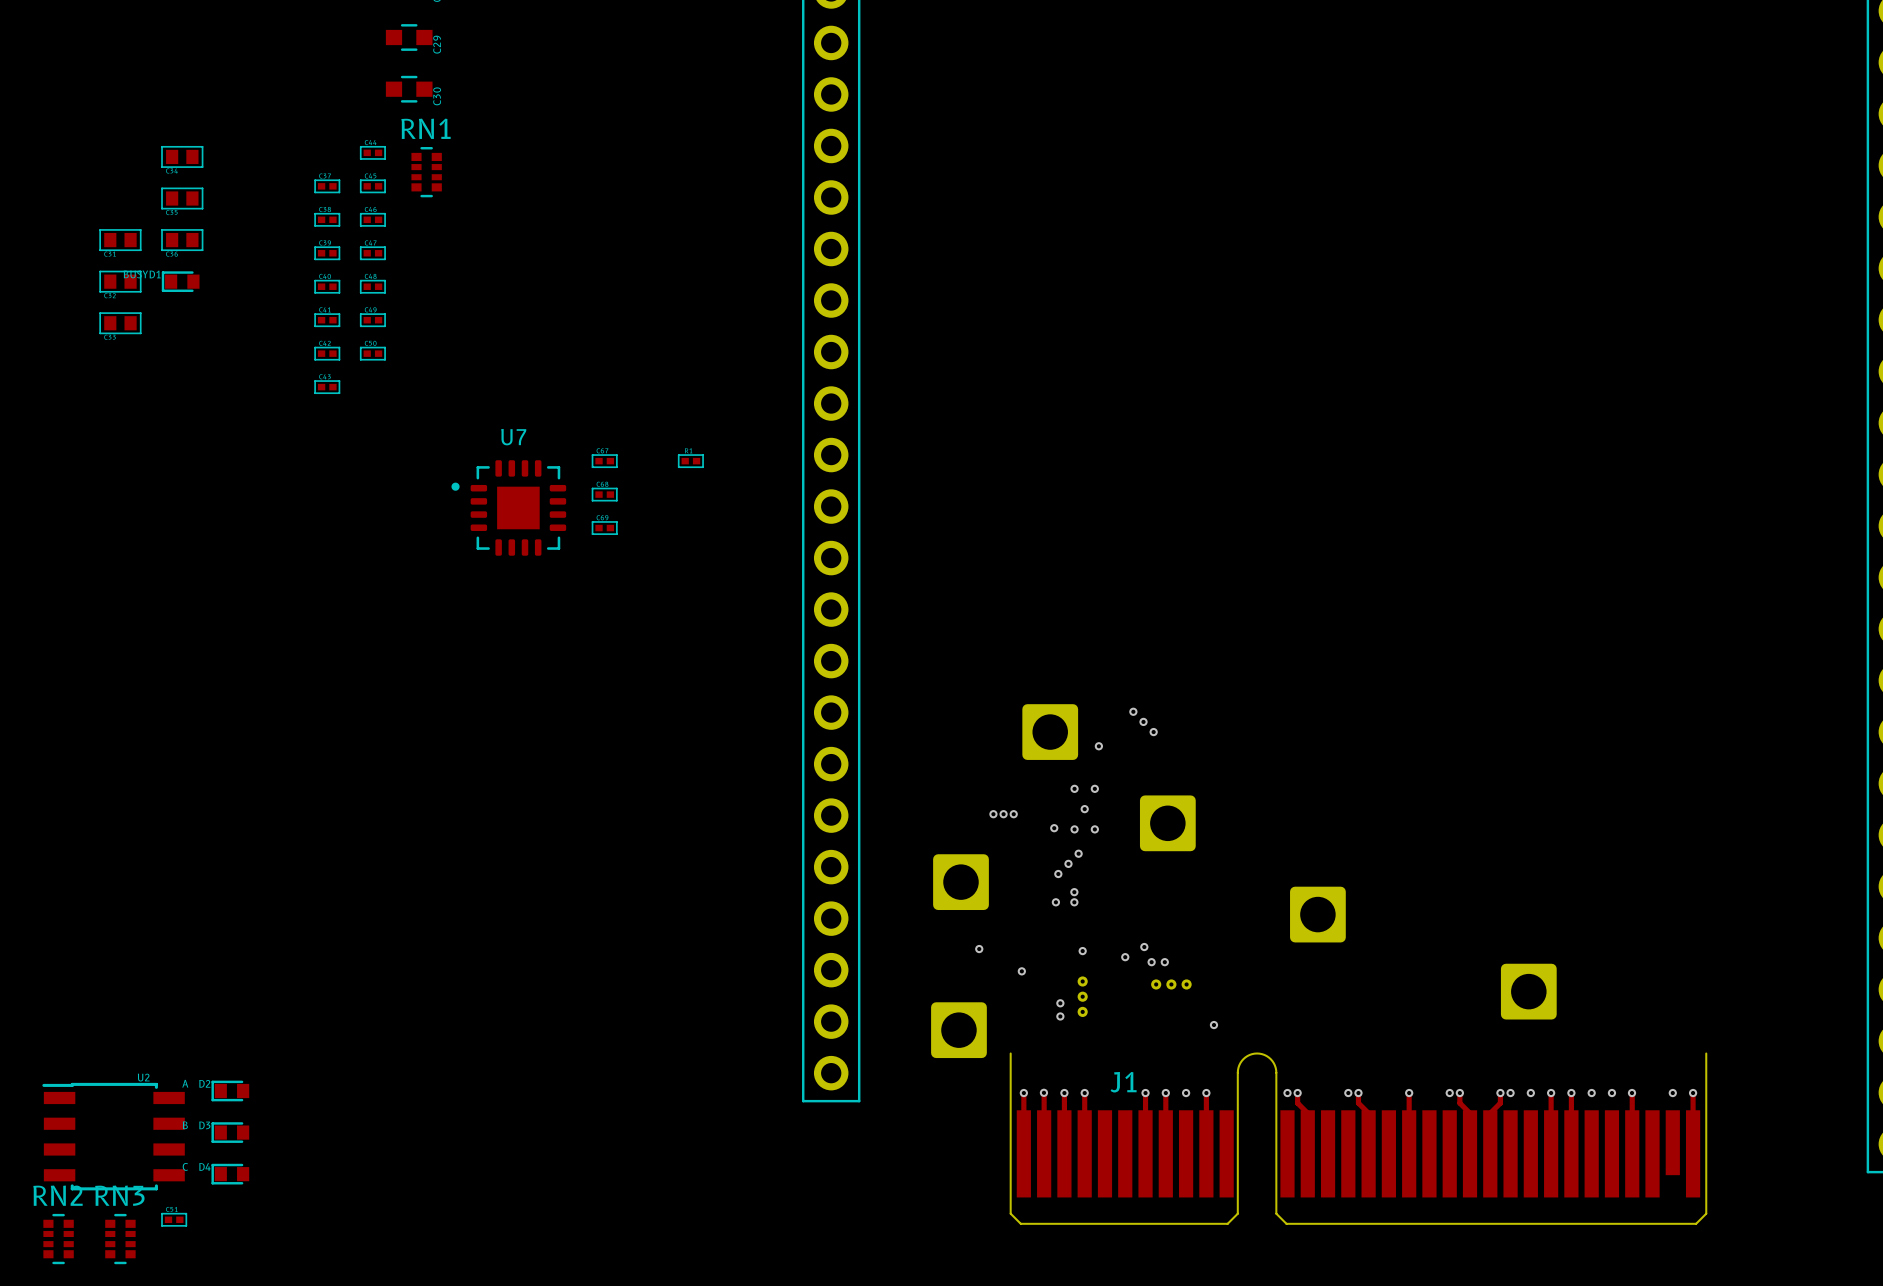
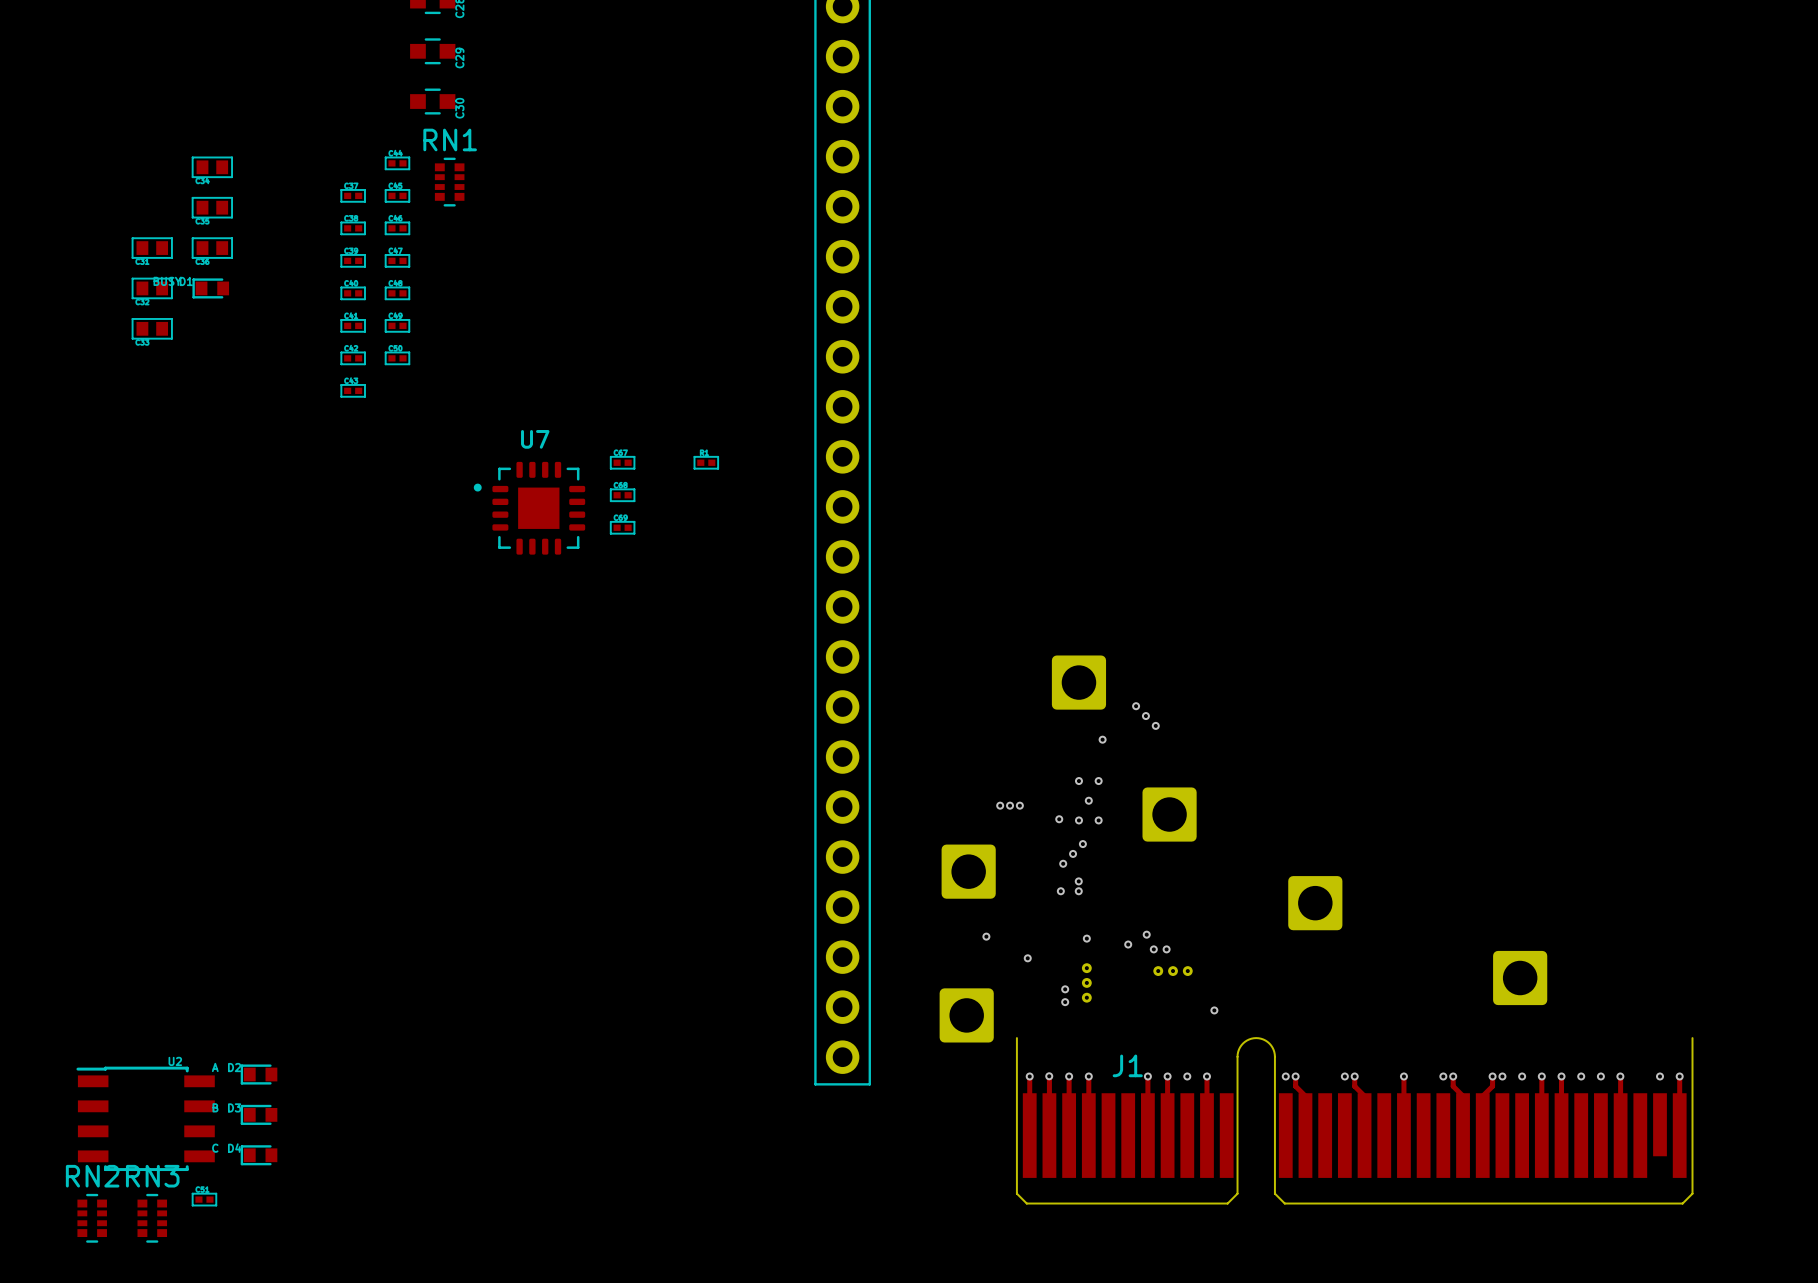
part position: (1050, 732) -> (1078, 682)

